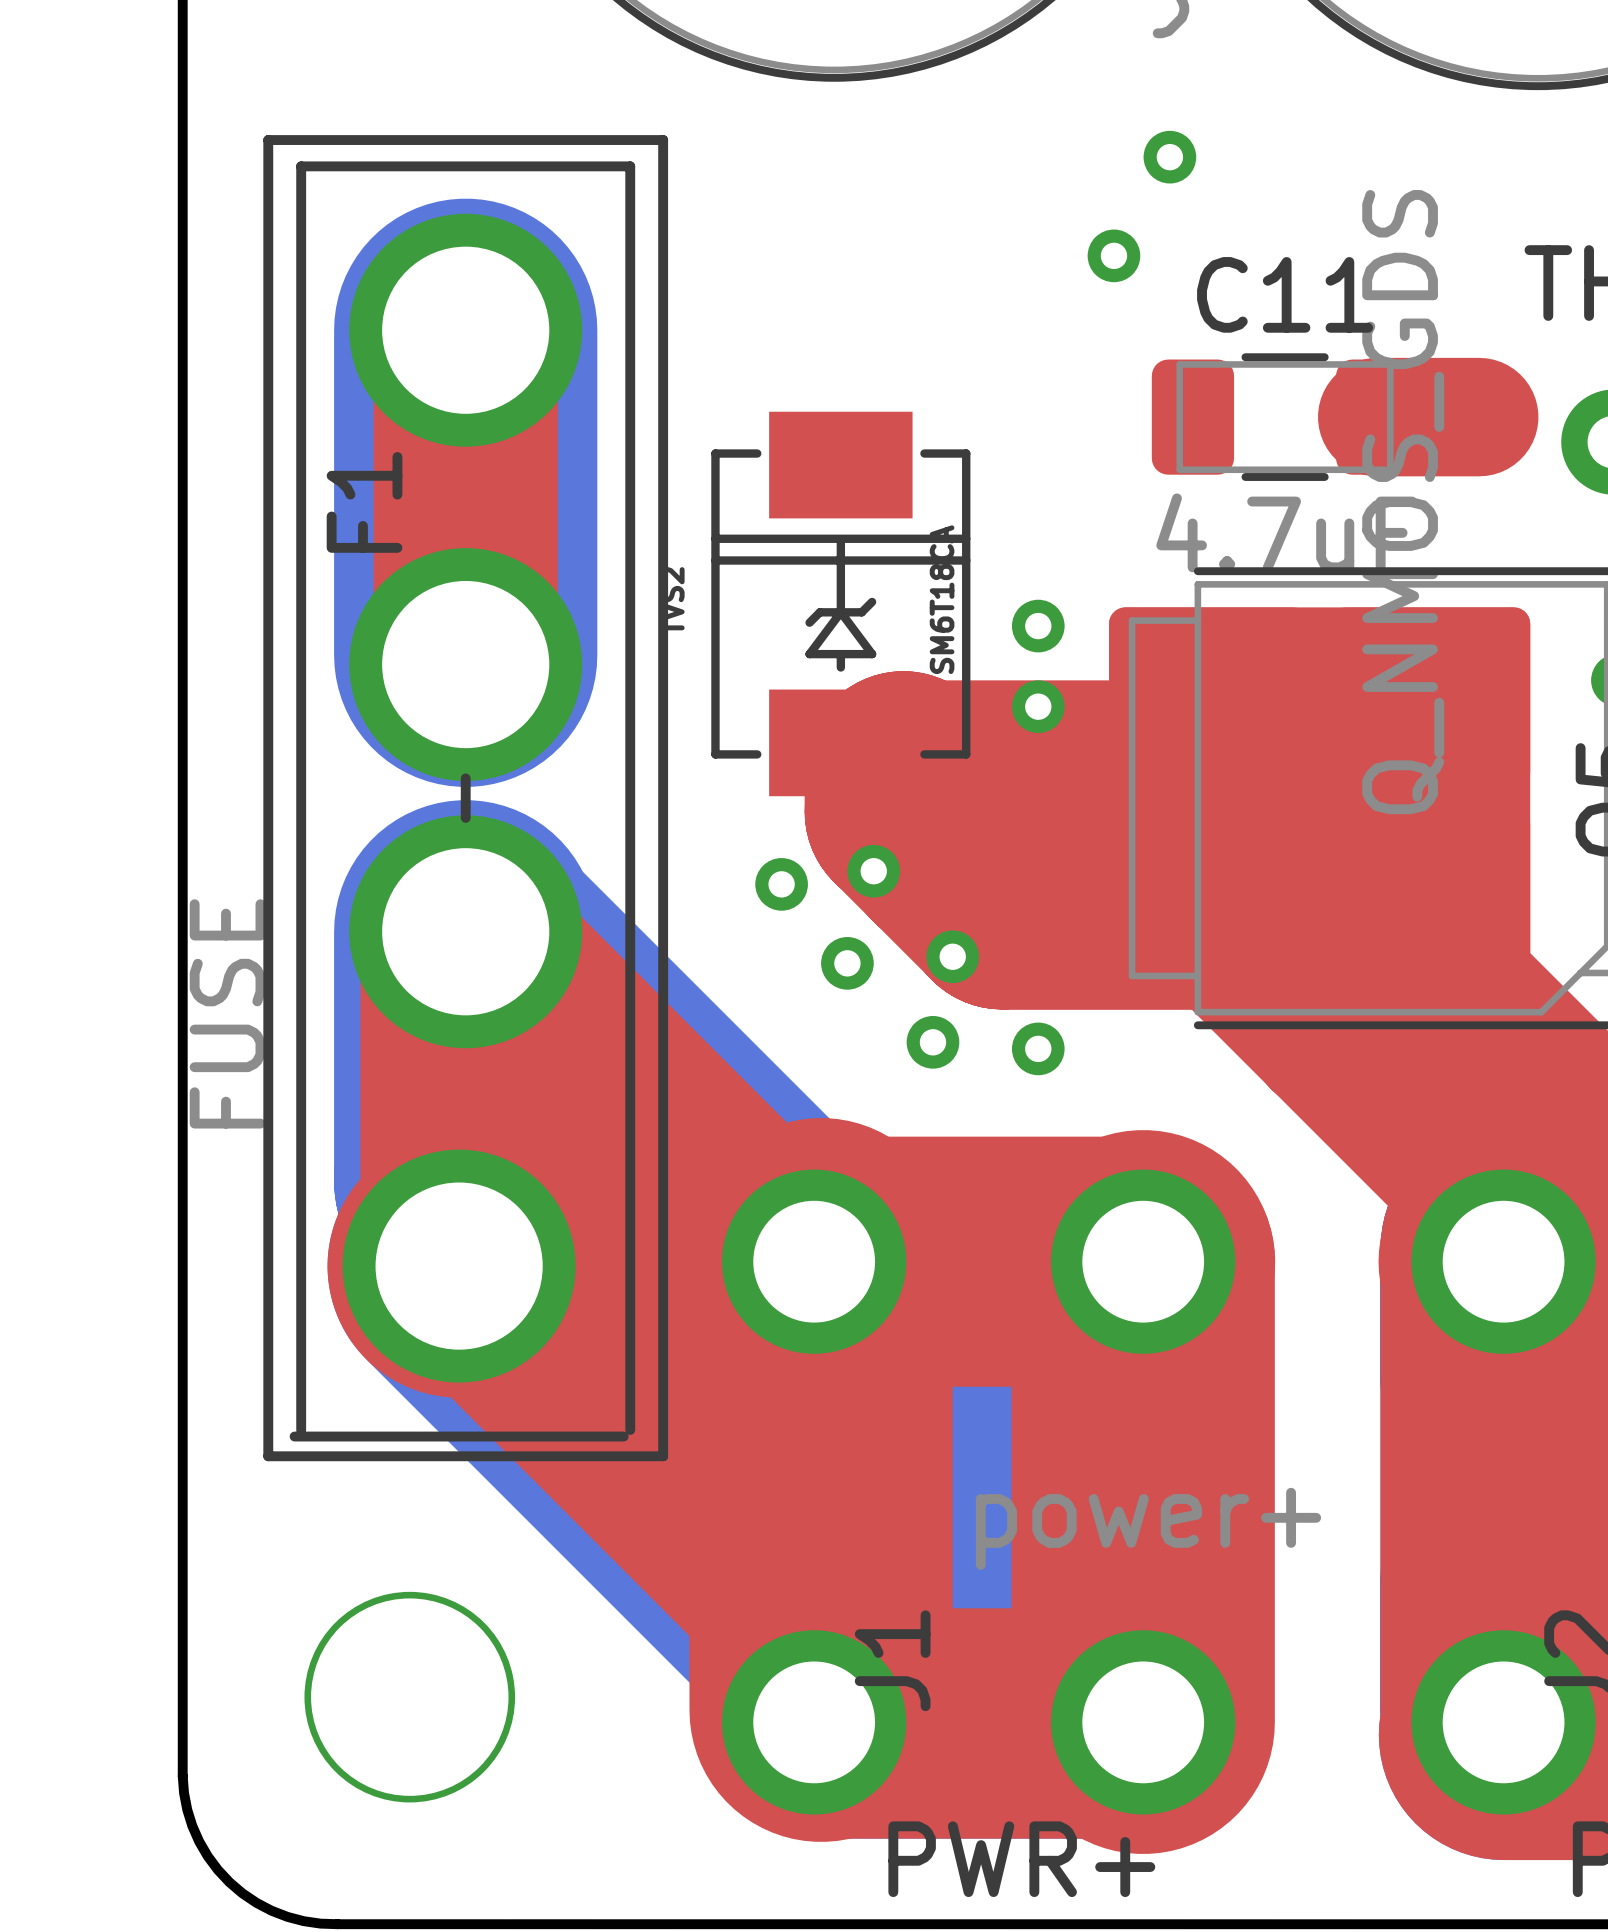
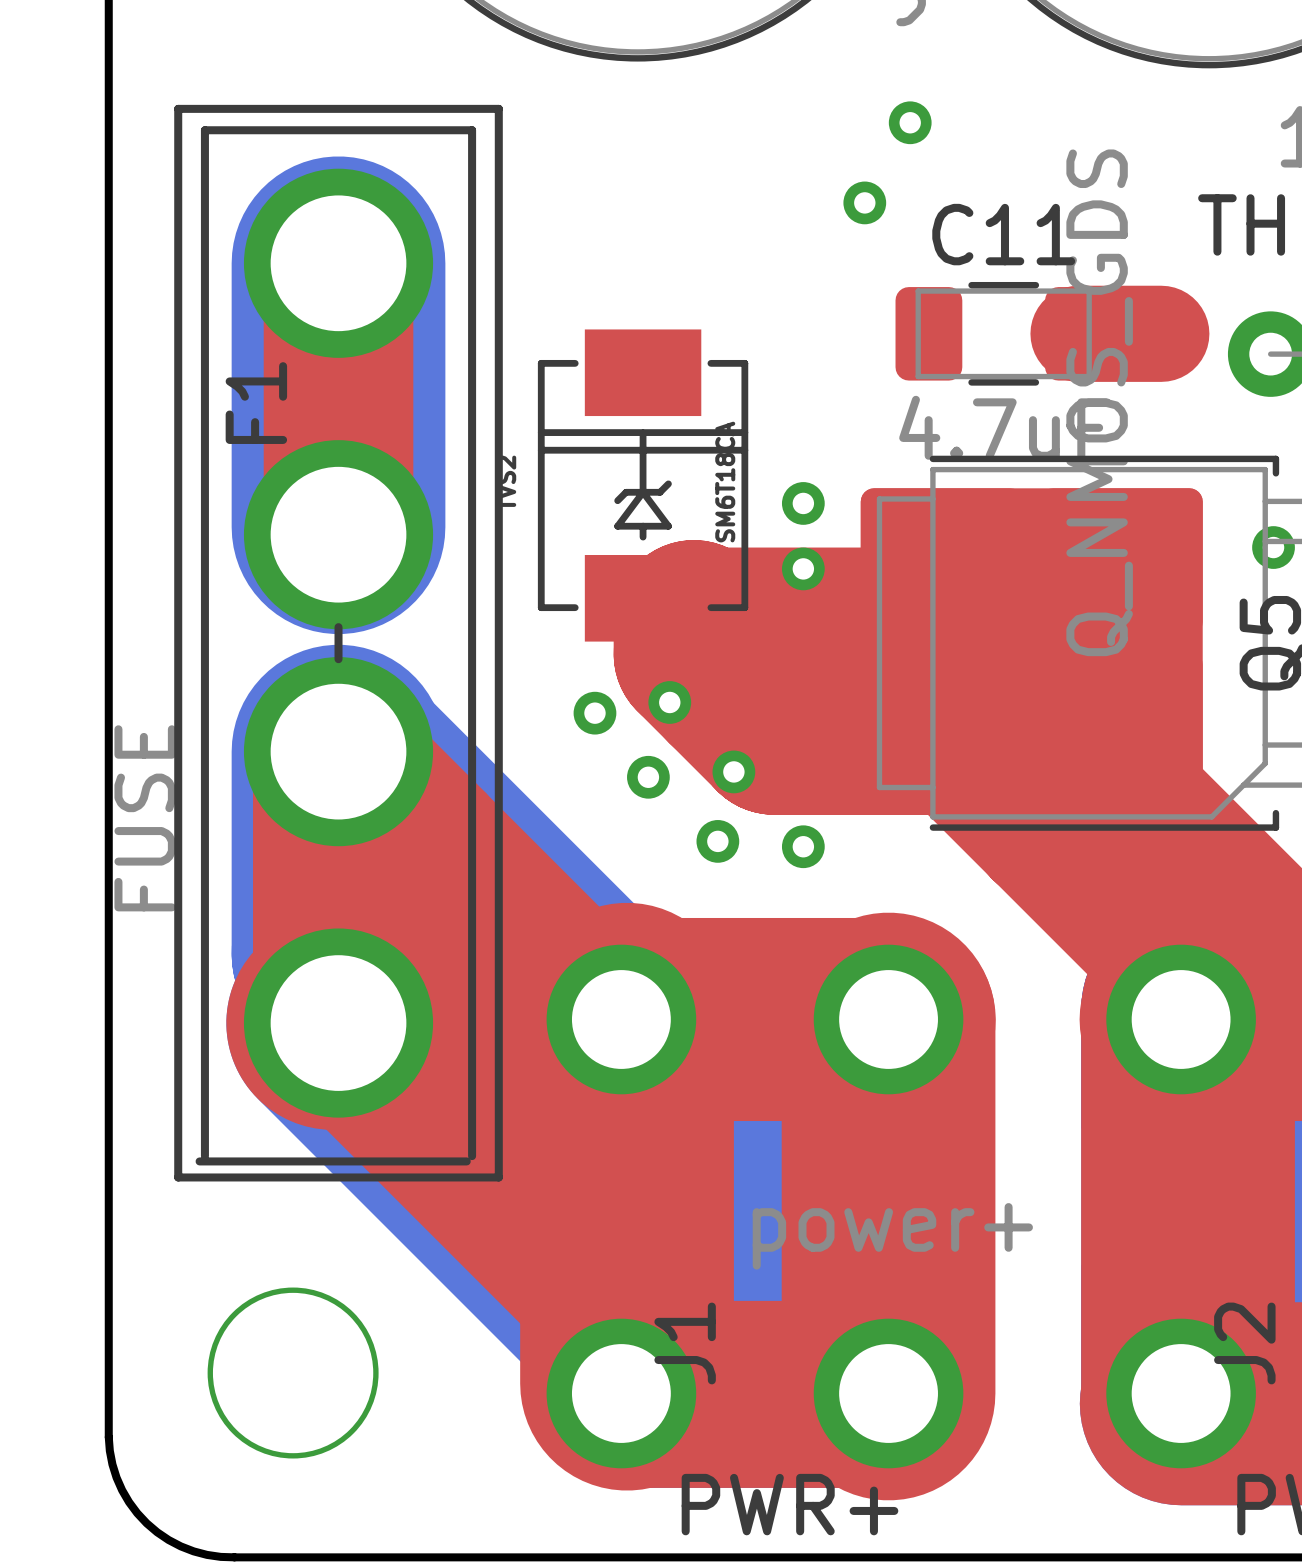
F1 footprint: [263, 135, 669, 1462] -> [174, 104, 503, 1182]

